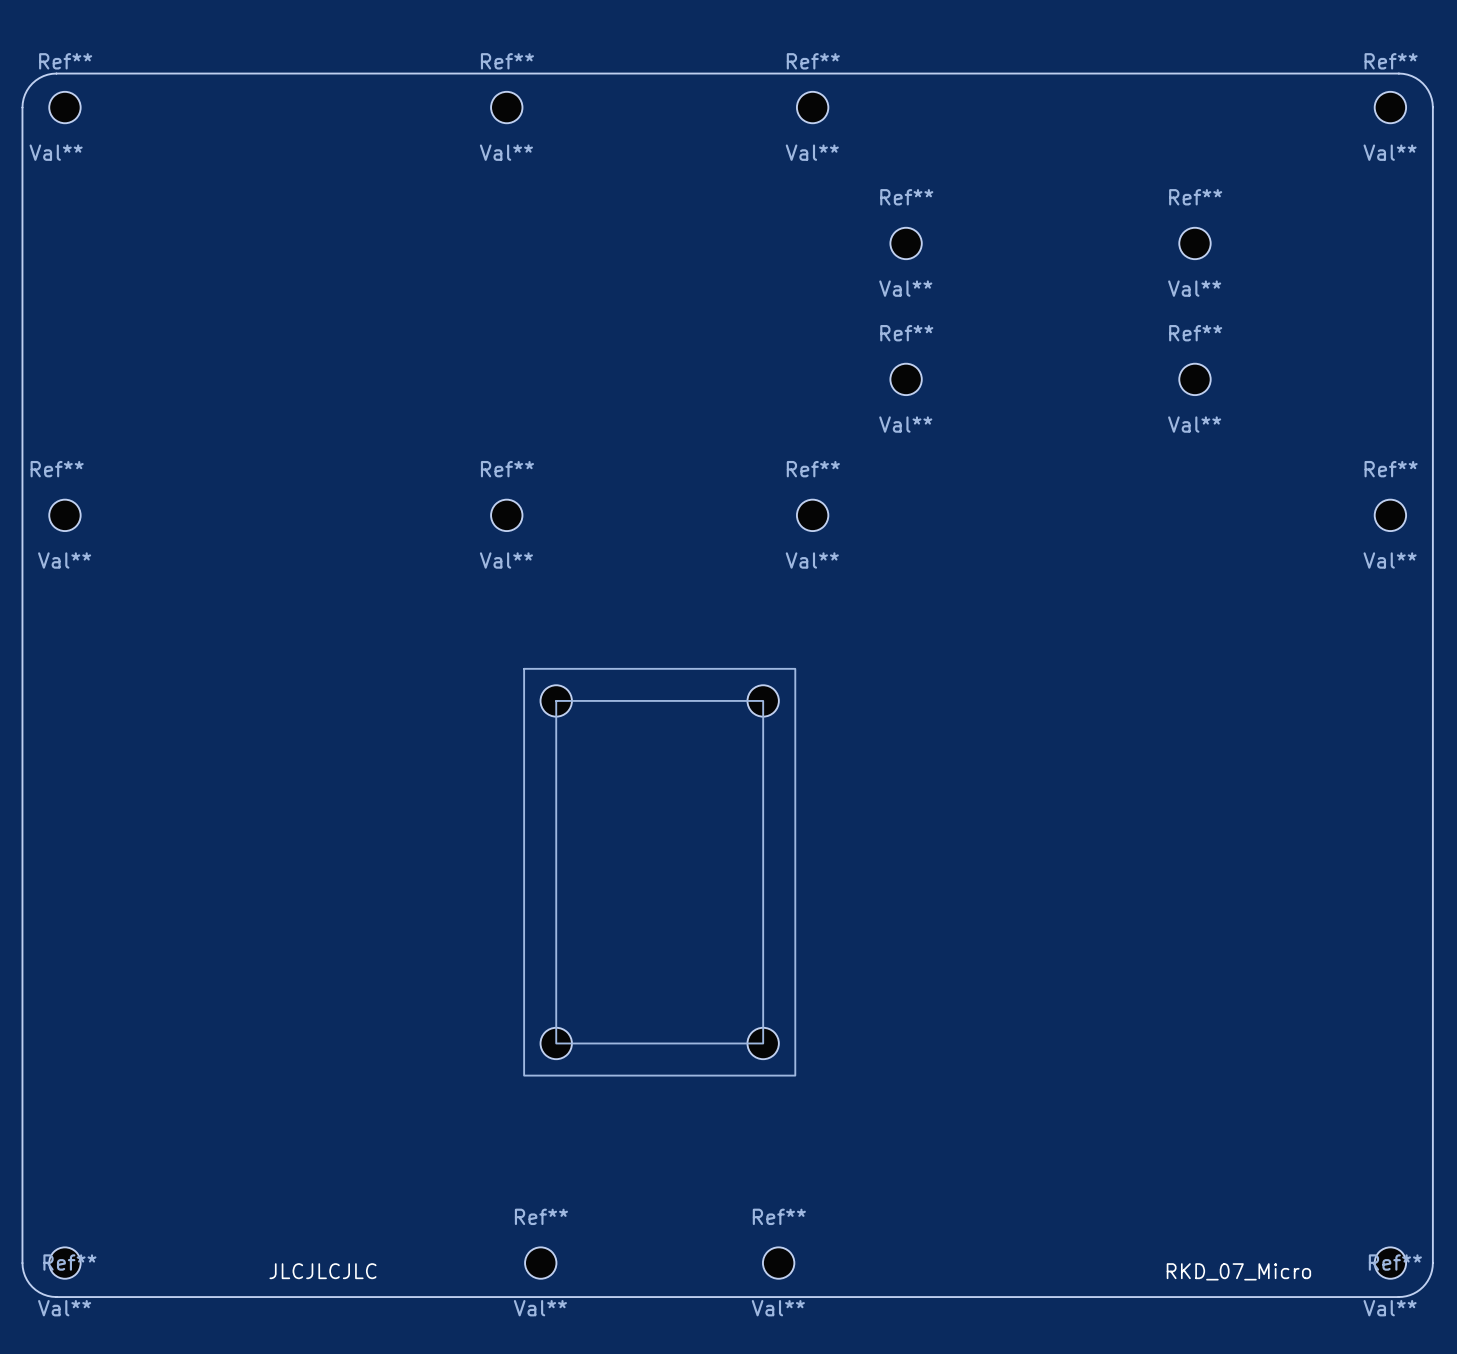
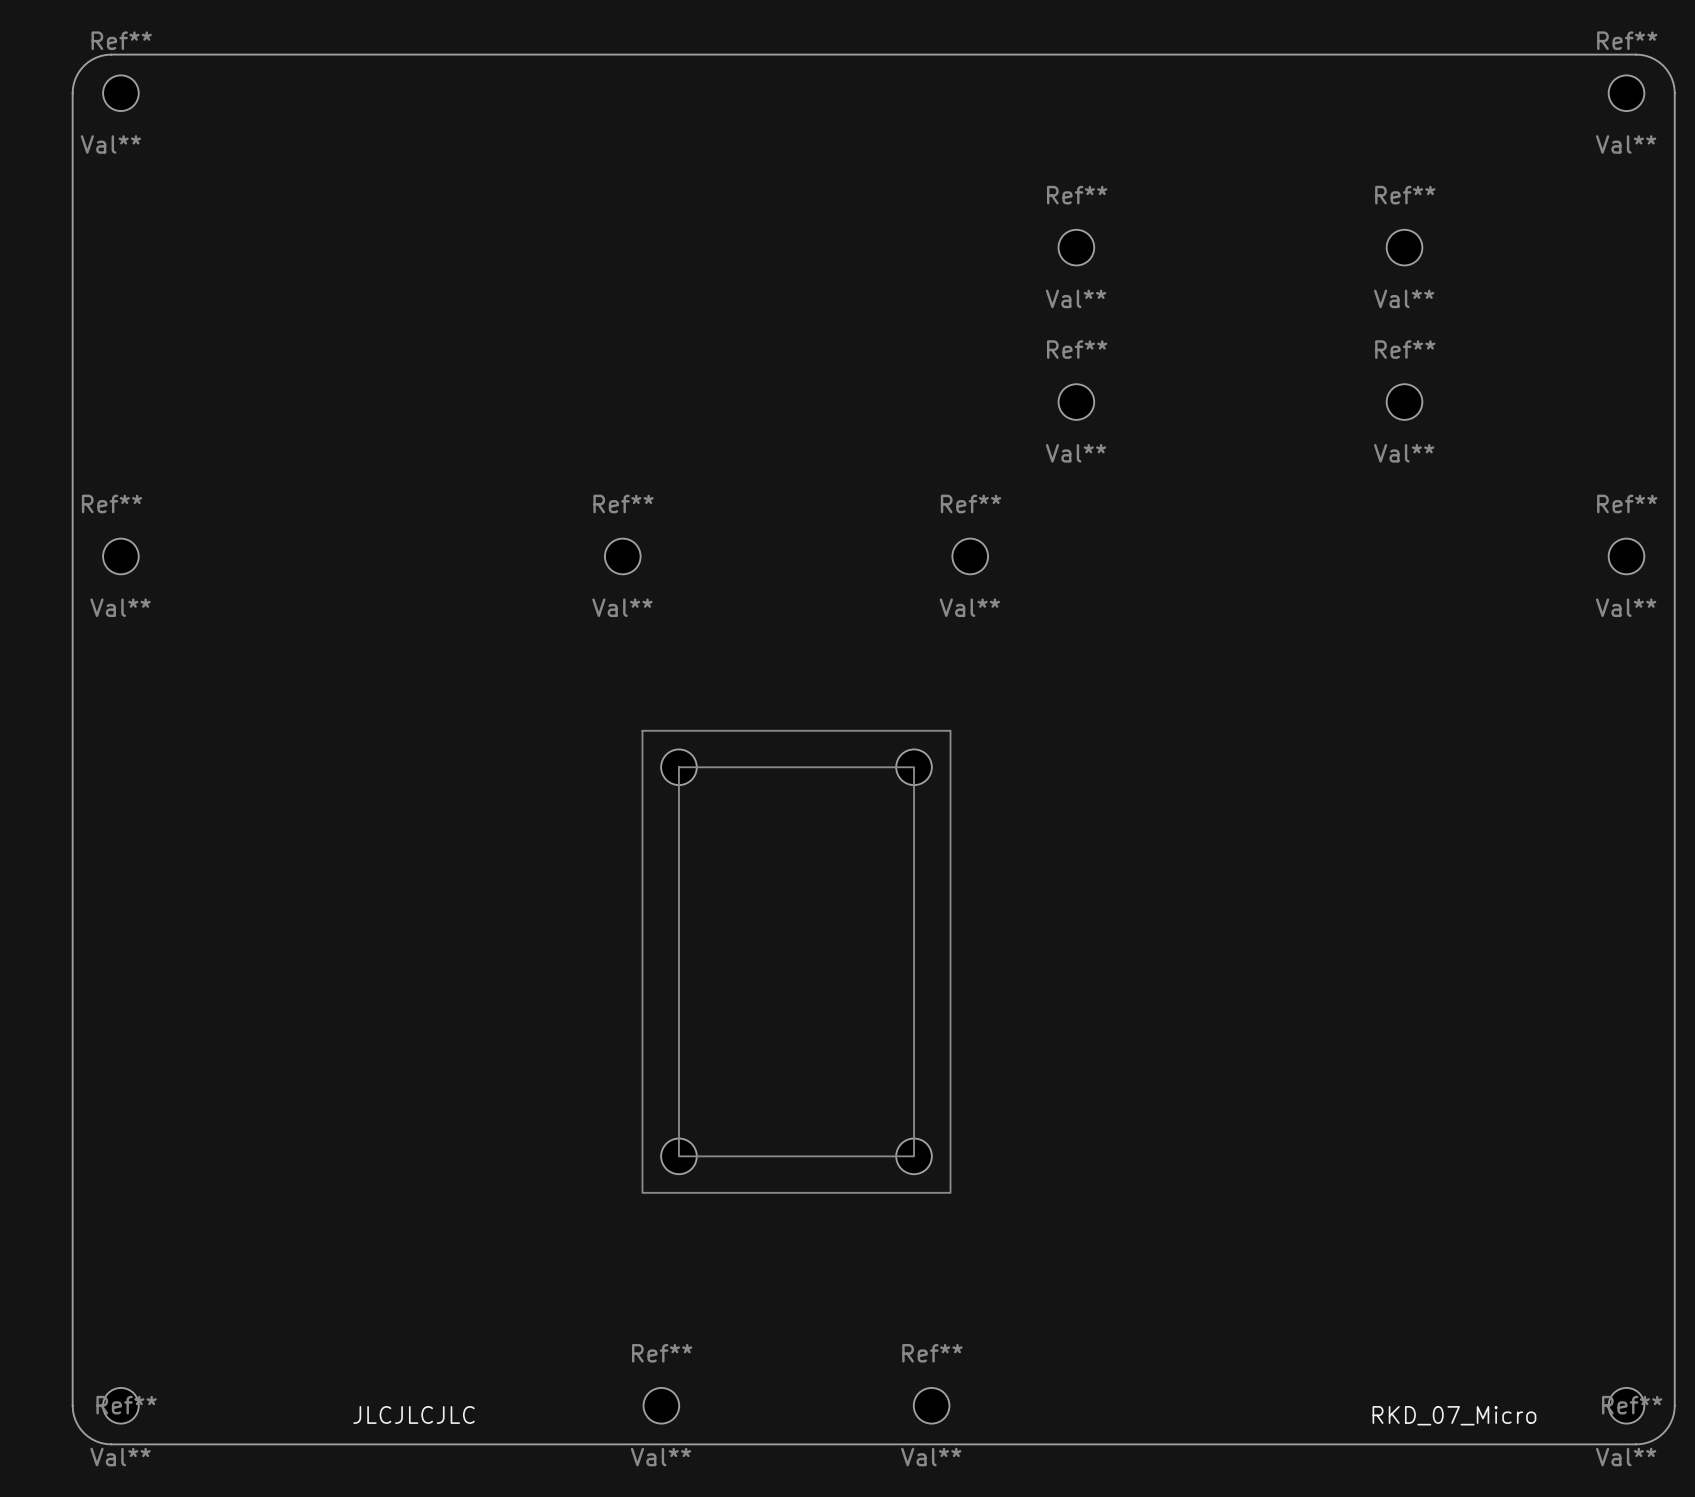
Ref**: Val** (506, 107) -> none
Ref**: Val** (812, 107) -> none

